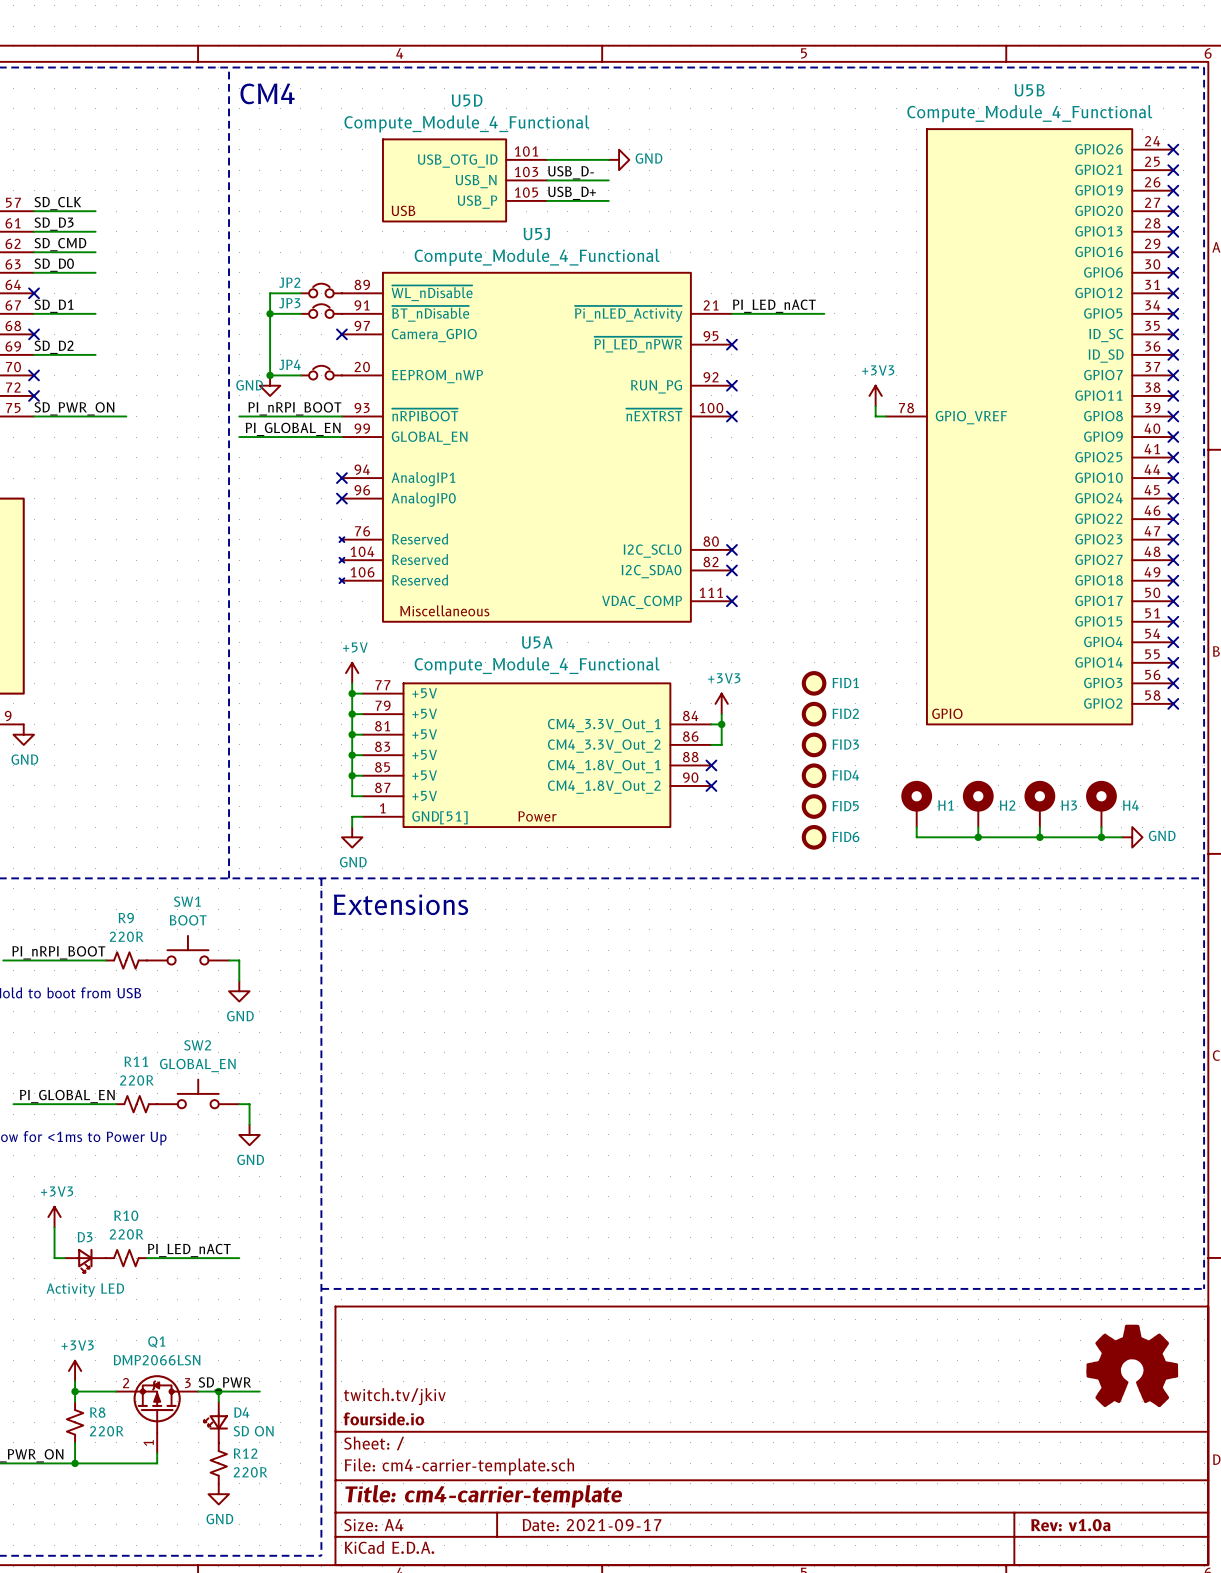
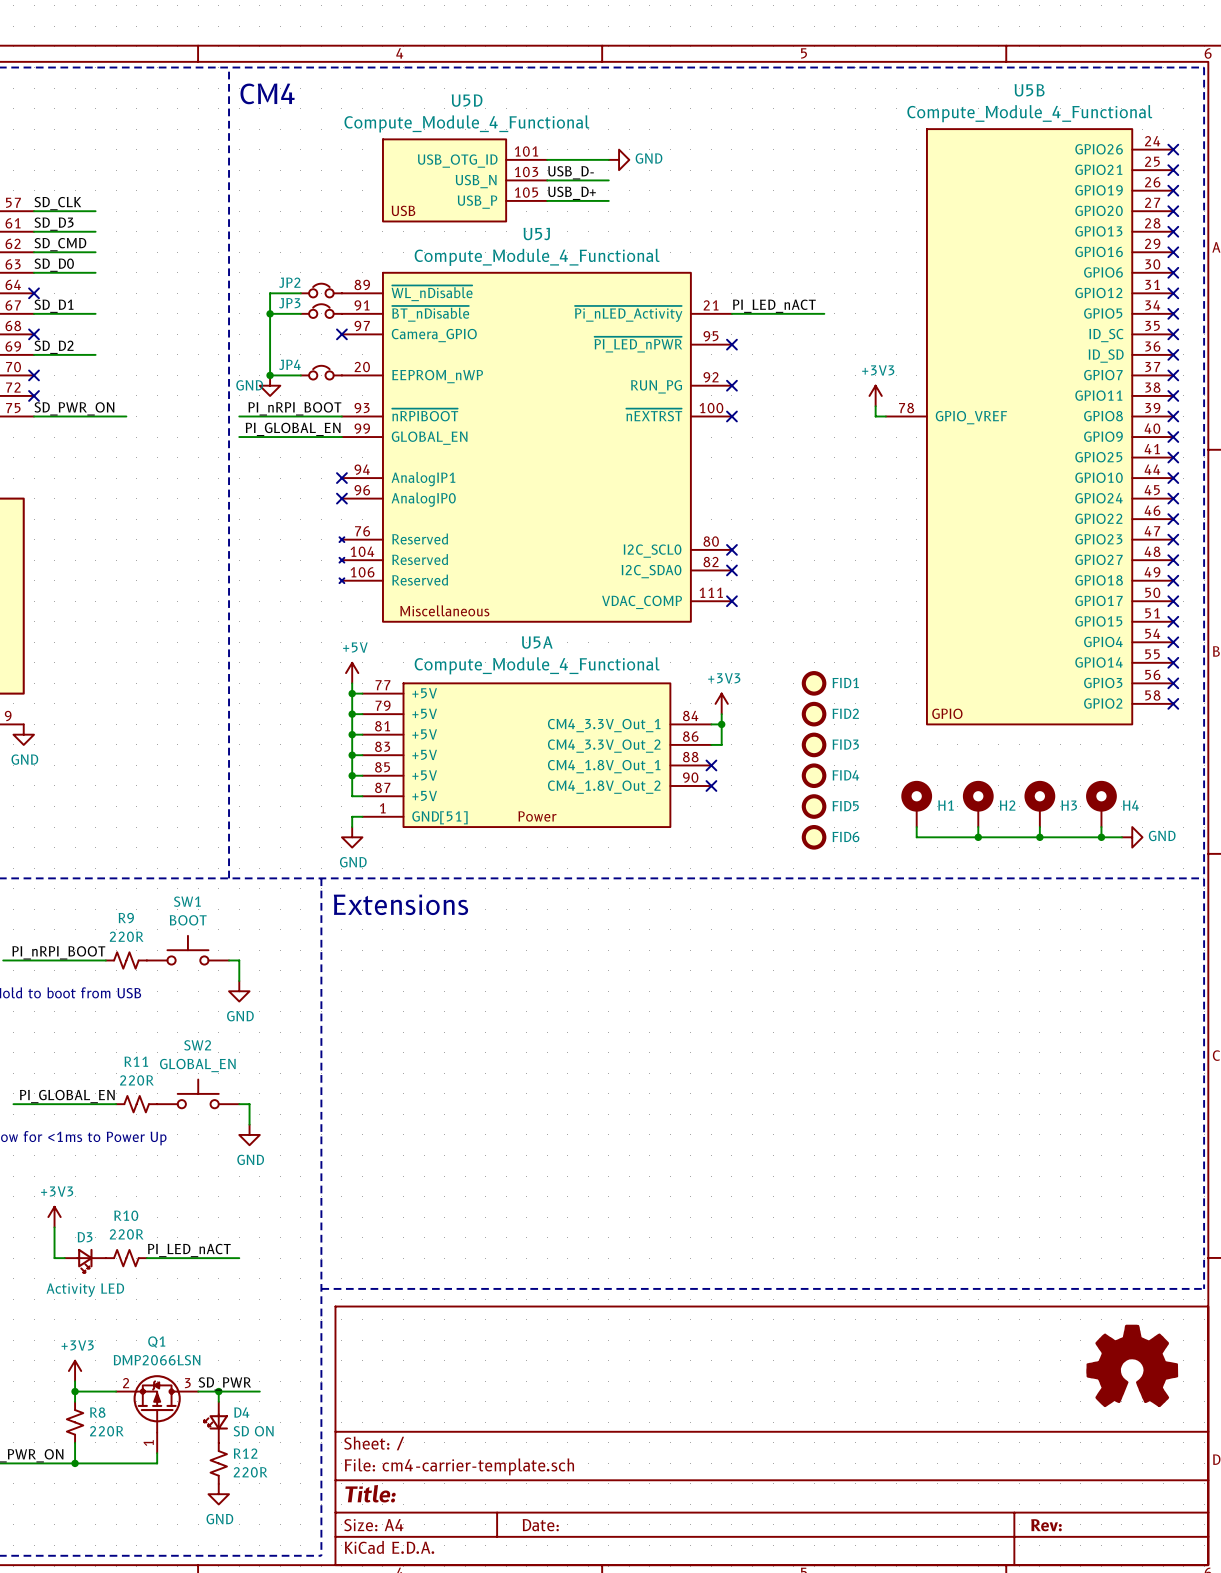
title block: twitch.tv/jkiv (394, 1396) -> none
title block: fourside.io (383, 1418) -> none
title block: Title: cm4-carrier-template (483, 1496) -> Title: (370, 1493)
title block: Date: 2021-09-17 (592, 1525) -> Date: (540, 1525)
title block: Rev: v1.0a (1070, 1525) -> Rev: (1046, 1525)

